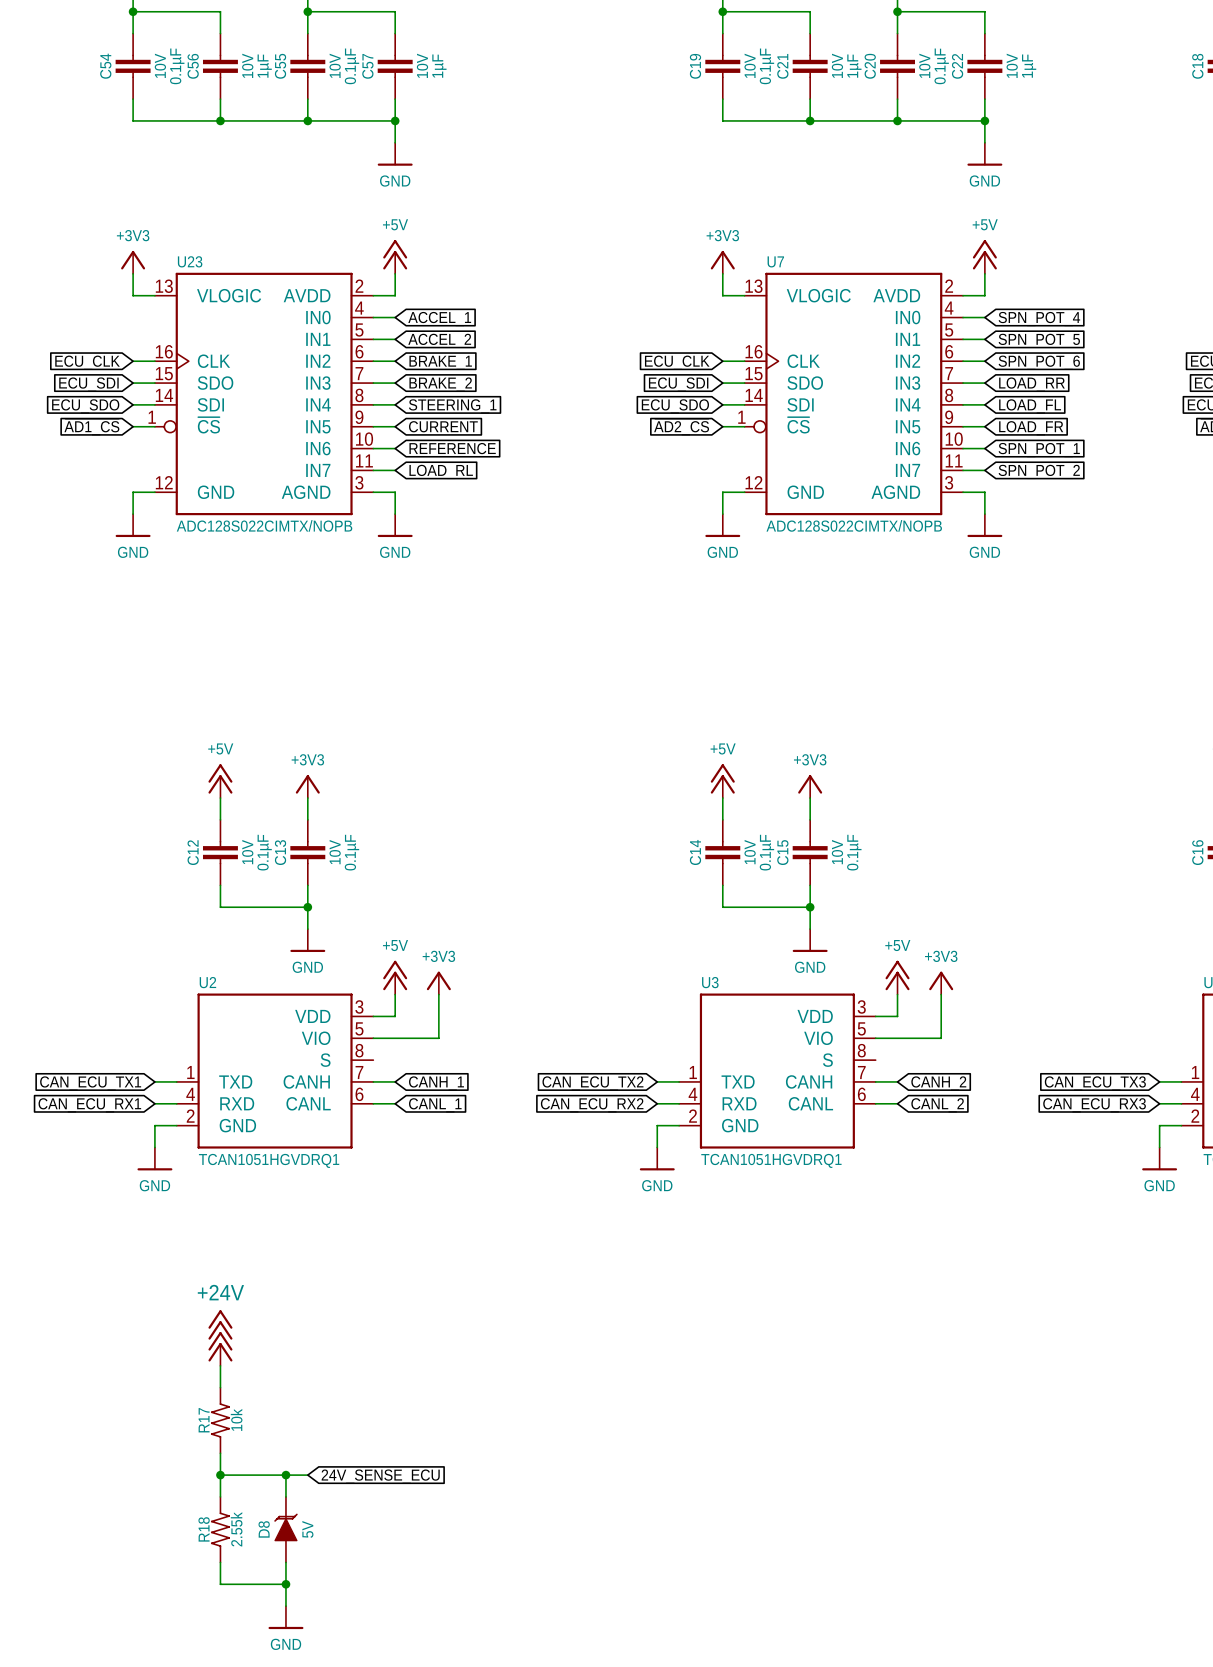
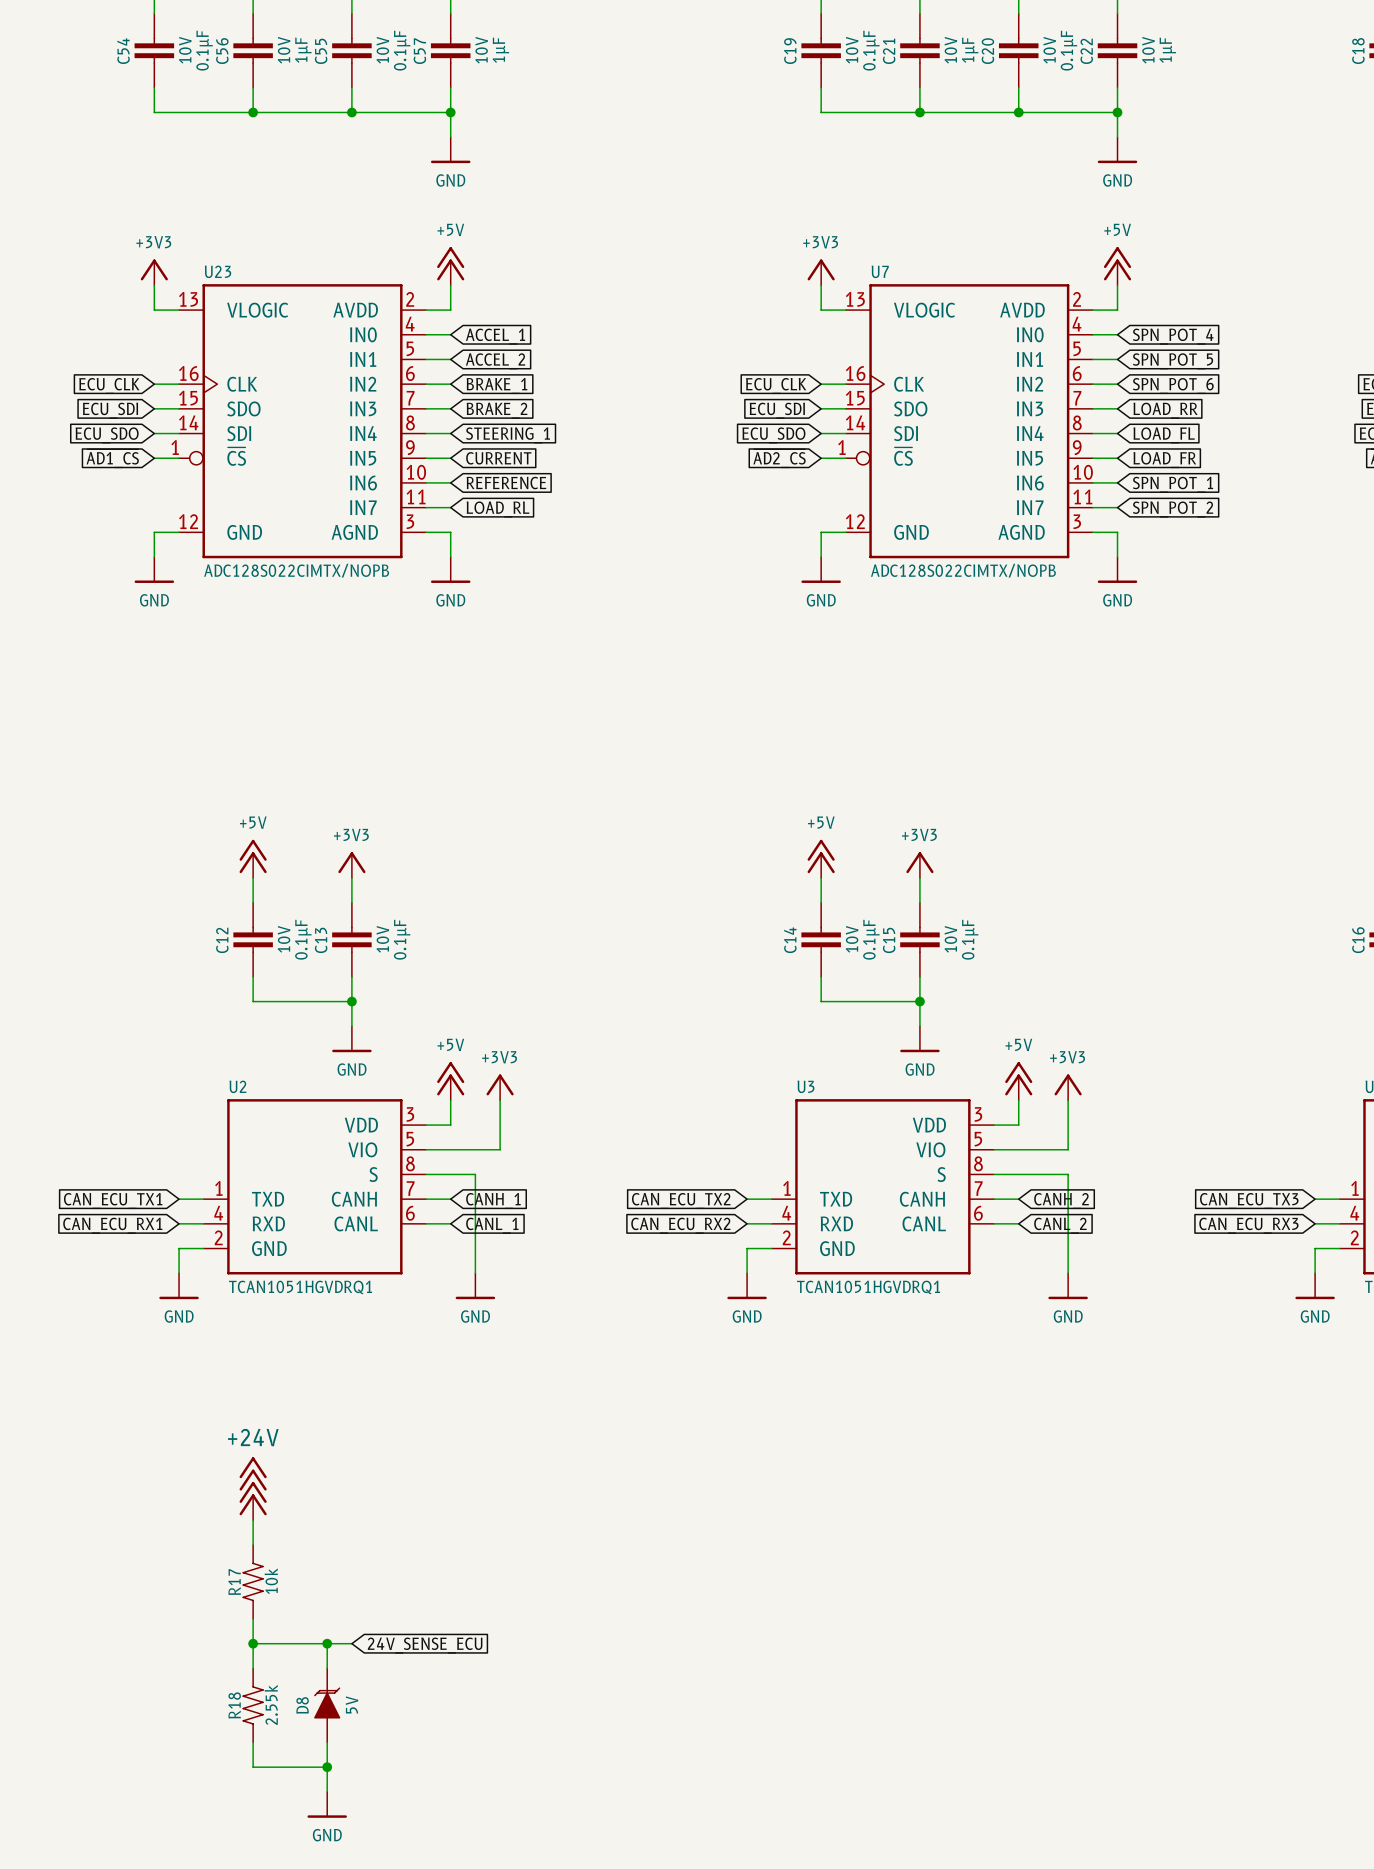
wire: none -> (426, 1174) (475, 1174) (475, 1273)
wire: none -> (994, 1174) (1068, 1174) (1068, 1273)
power symbol: none -> GND (475, 1286)
power symbol: none -> GND (1068, 1286)

